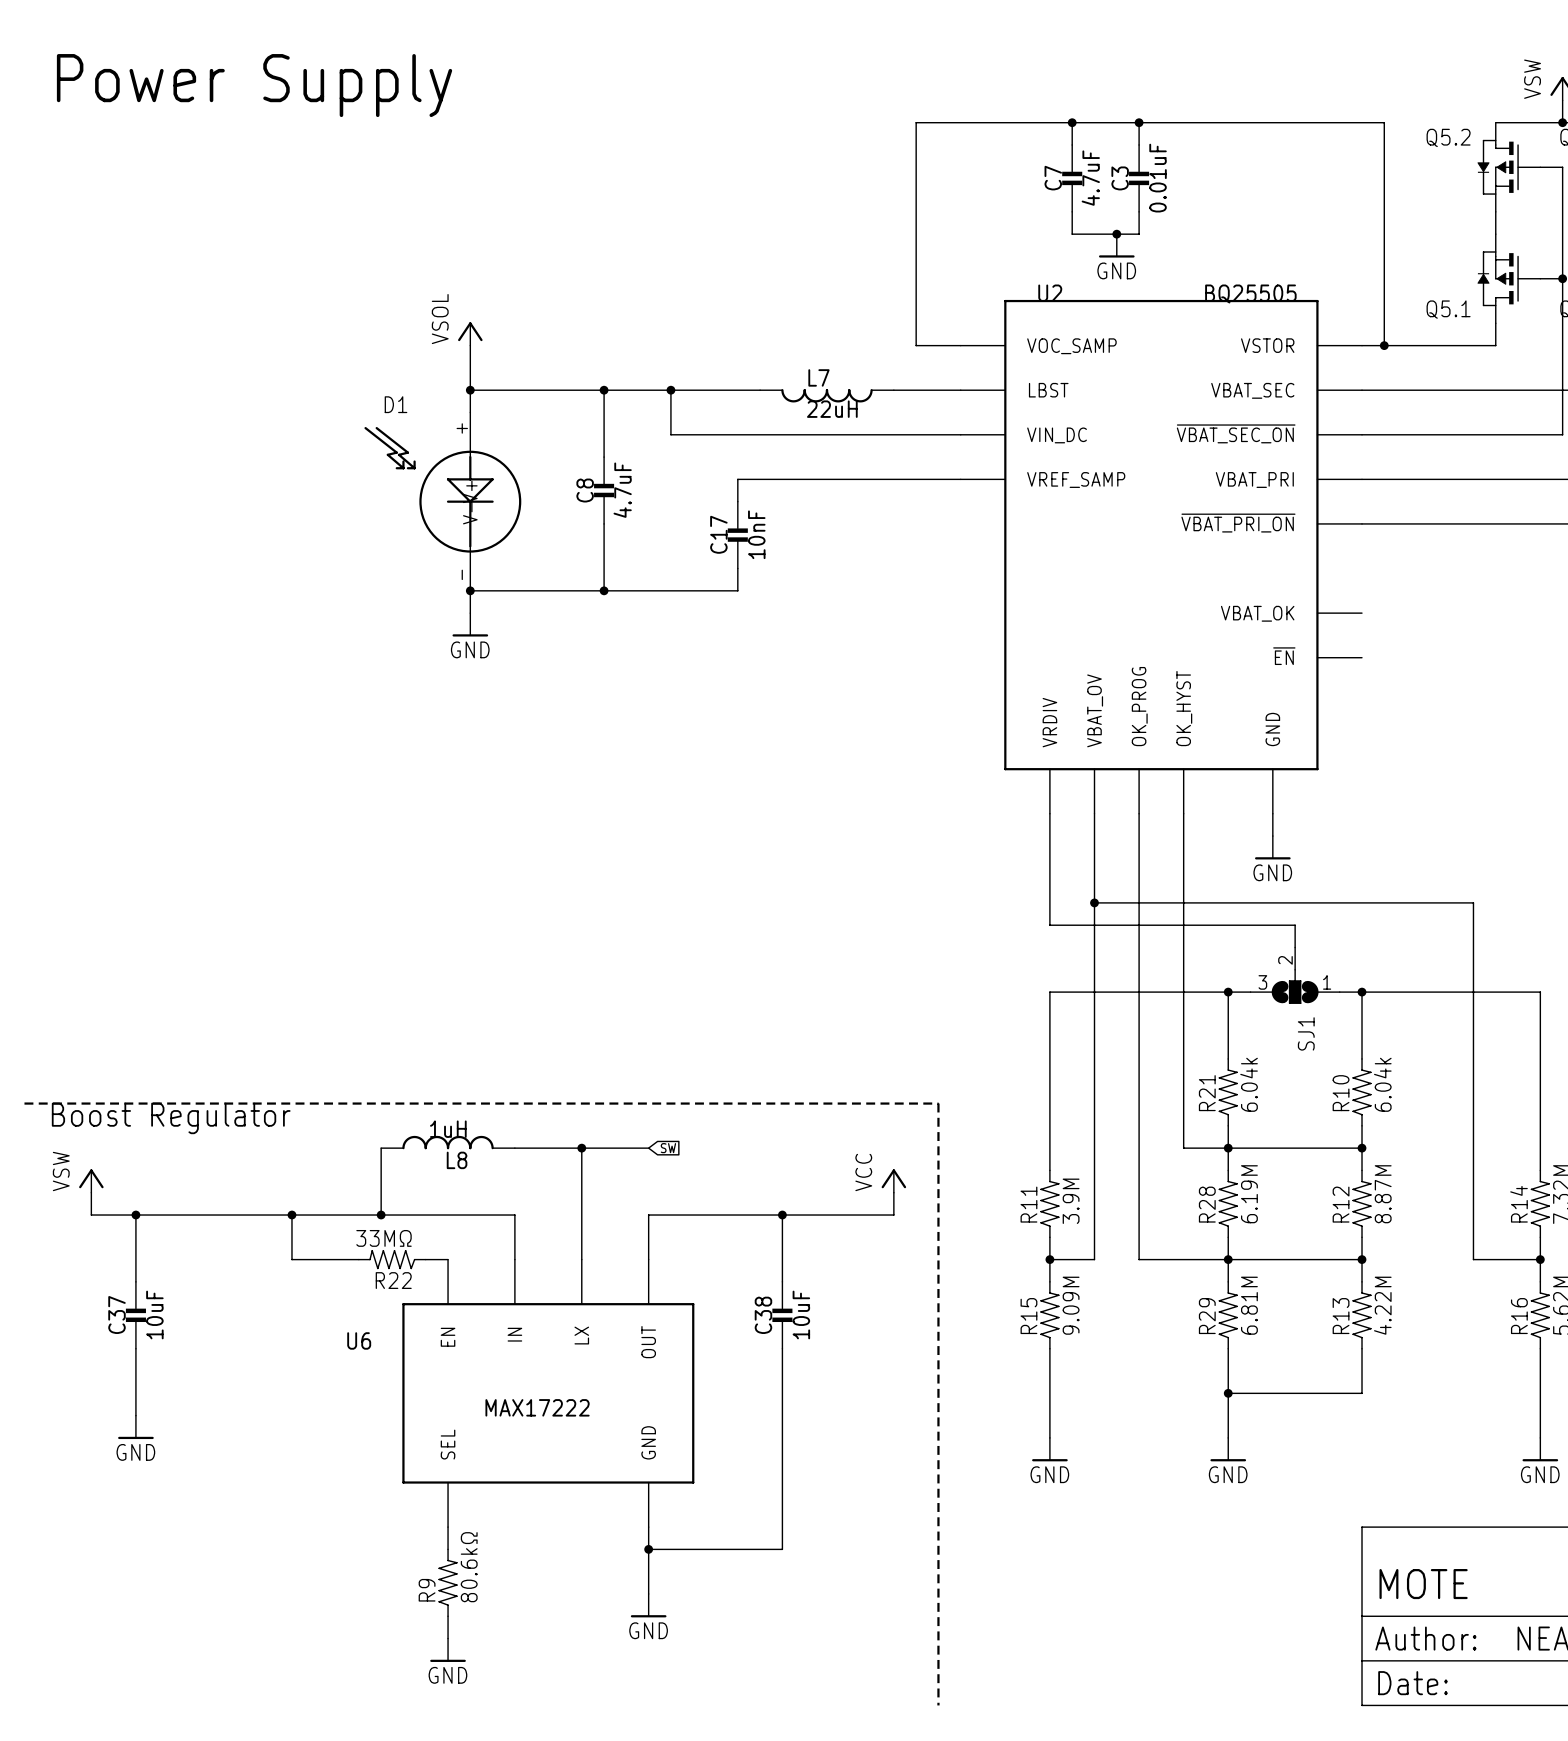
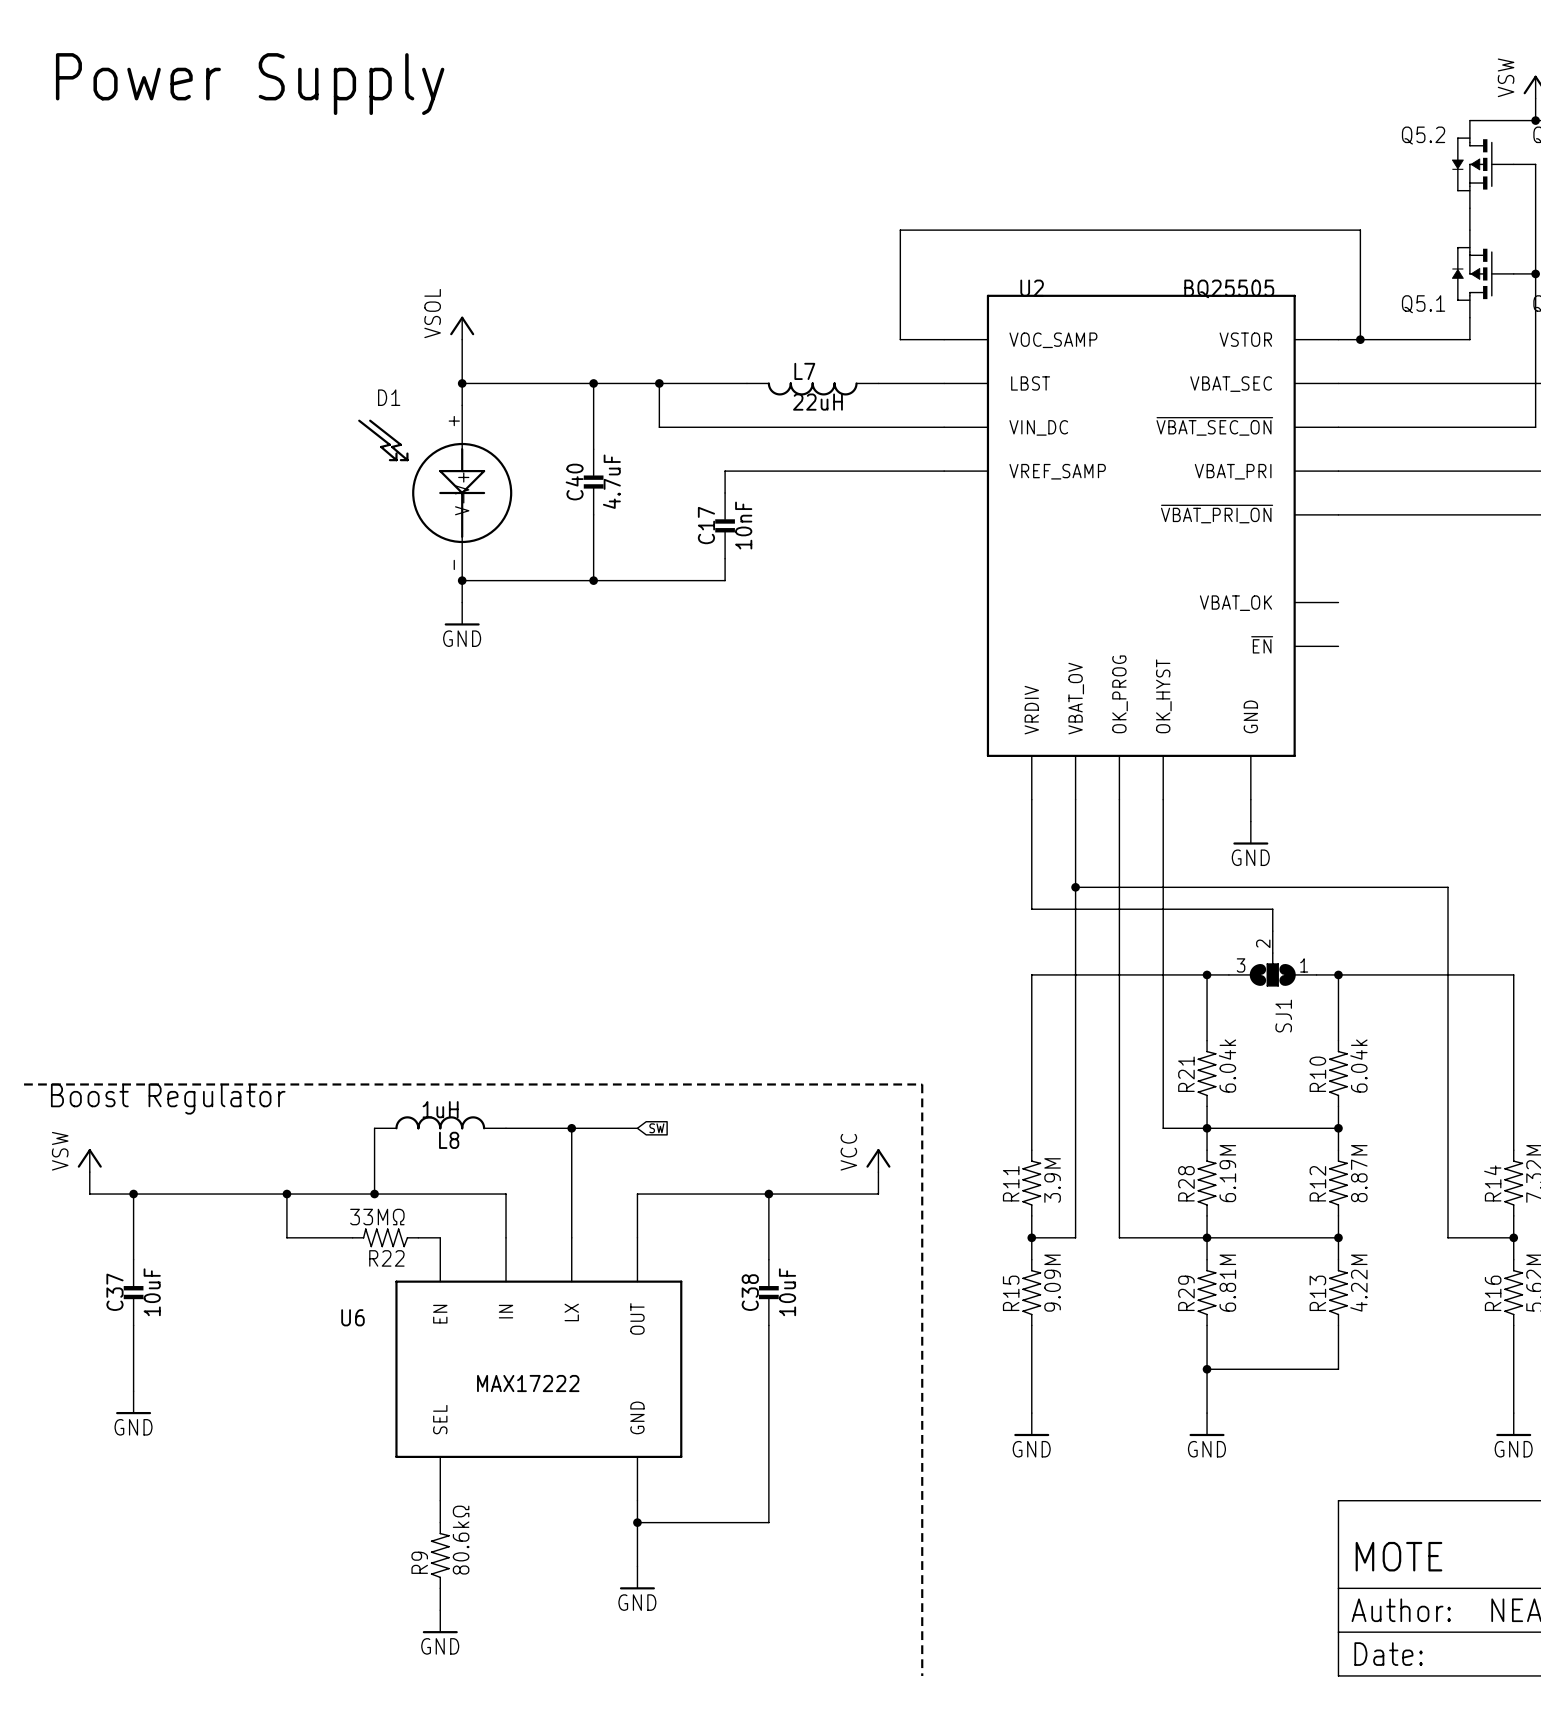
wire: (1072, 122) (1072, 144) -> none
junction: (1072, 122) -> none
wire: (1139, 122) (1139, 144) -> none
junction: (1139, 122) -> none
C7: 4.7uF (1072, 178) -> none
C3: 0.01uF (1139, 178) -> none
wire: (1072, 211) (1072, 234) -> (900, 230) (1053, 230)
wire: (1139, 211) (1139, 234) -> none
wire: (916, 234) (916, 122) (1384, 122) (1384, 234) -> (1119, 230) (1360, 230)
junction: (1116, 234) -> none
power symbol: GND (1116, 245) -> none
C8 name: C8 (585, 490) -> C40 (574, 482)

